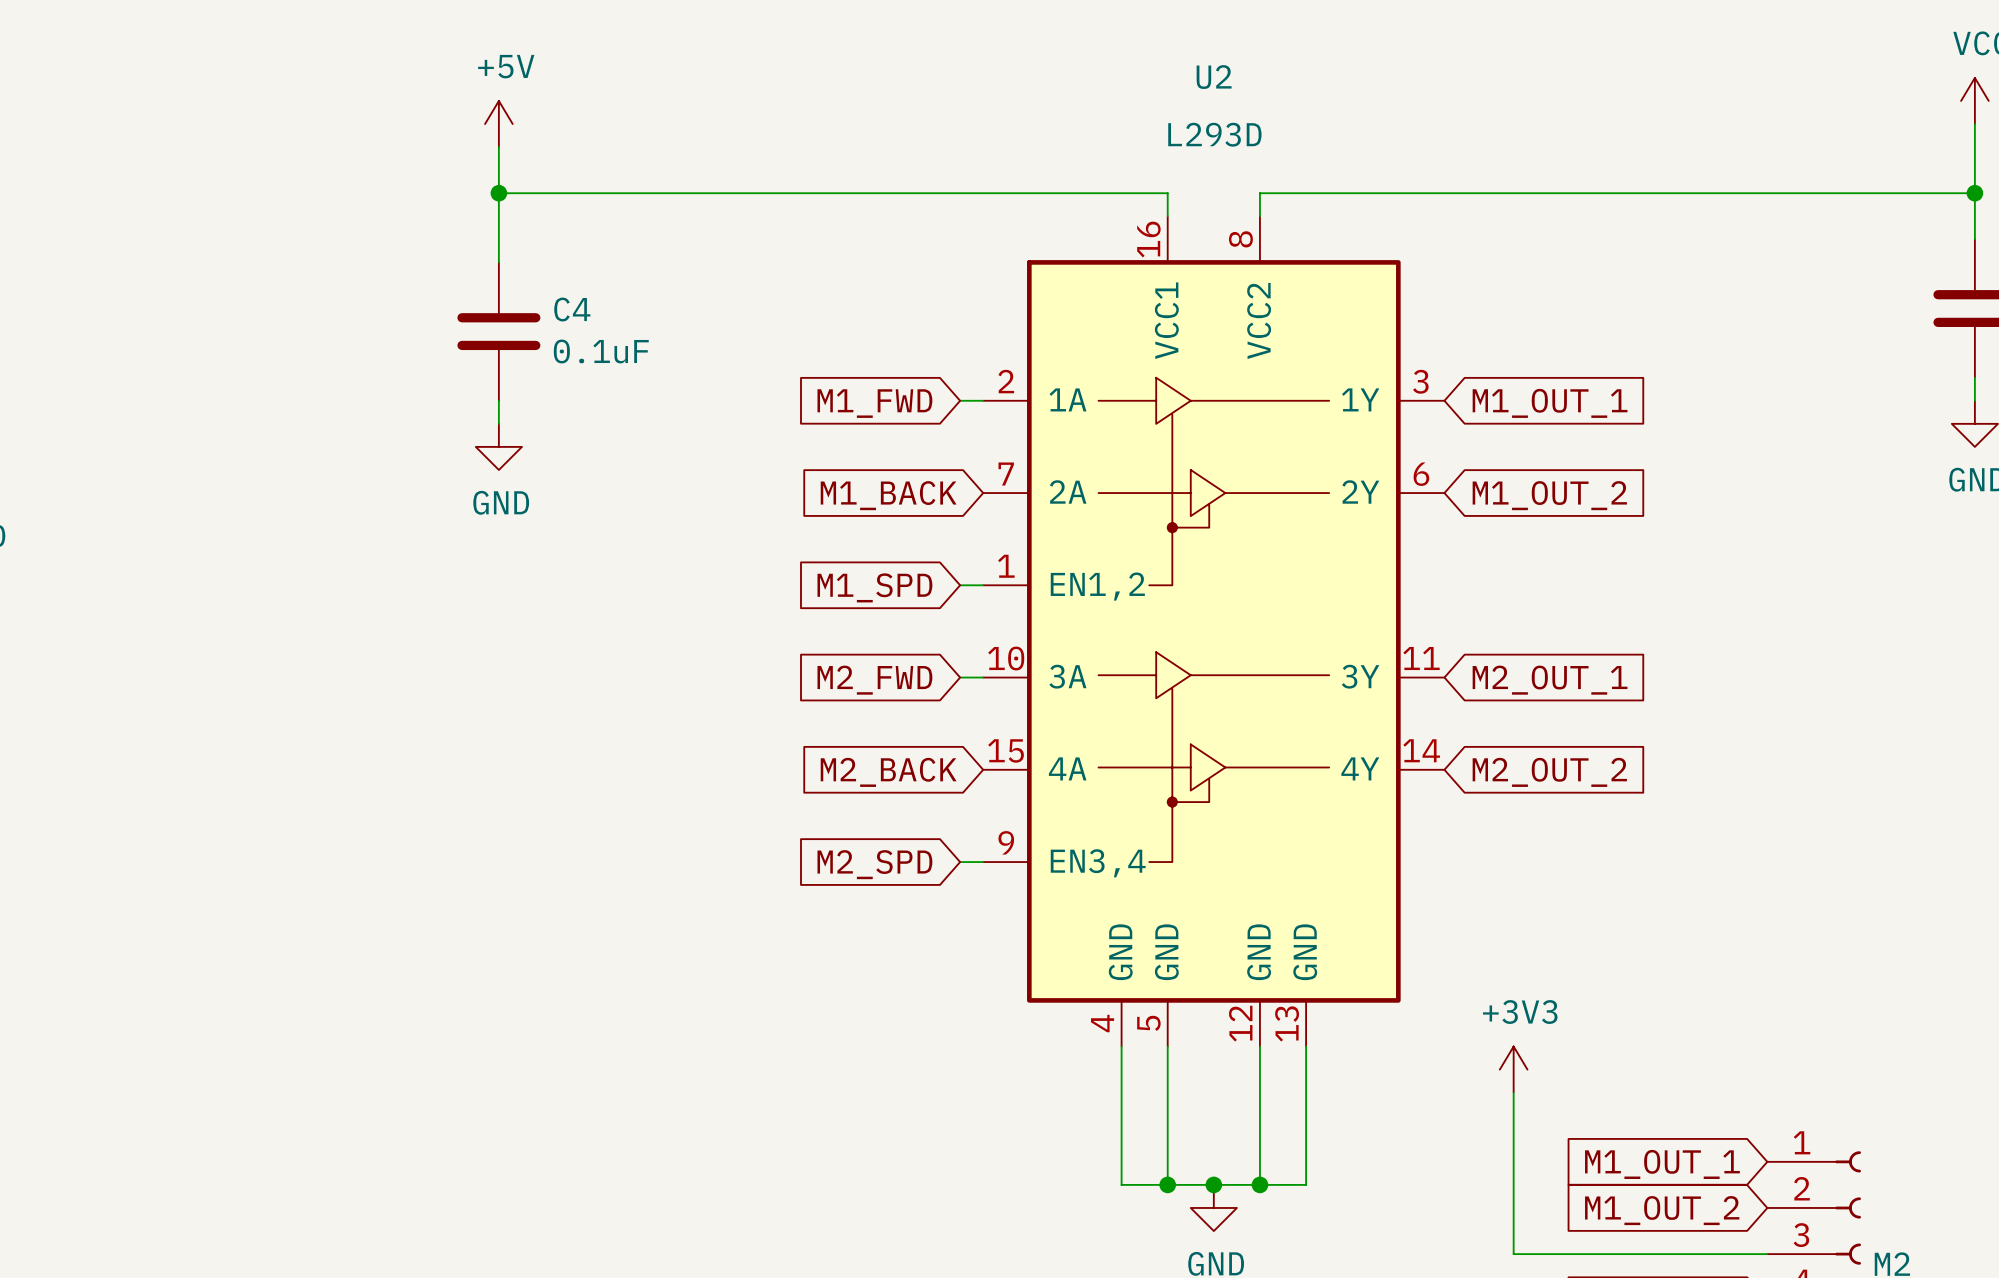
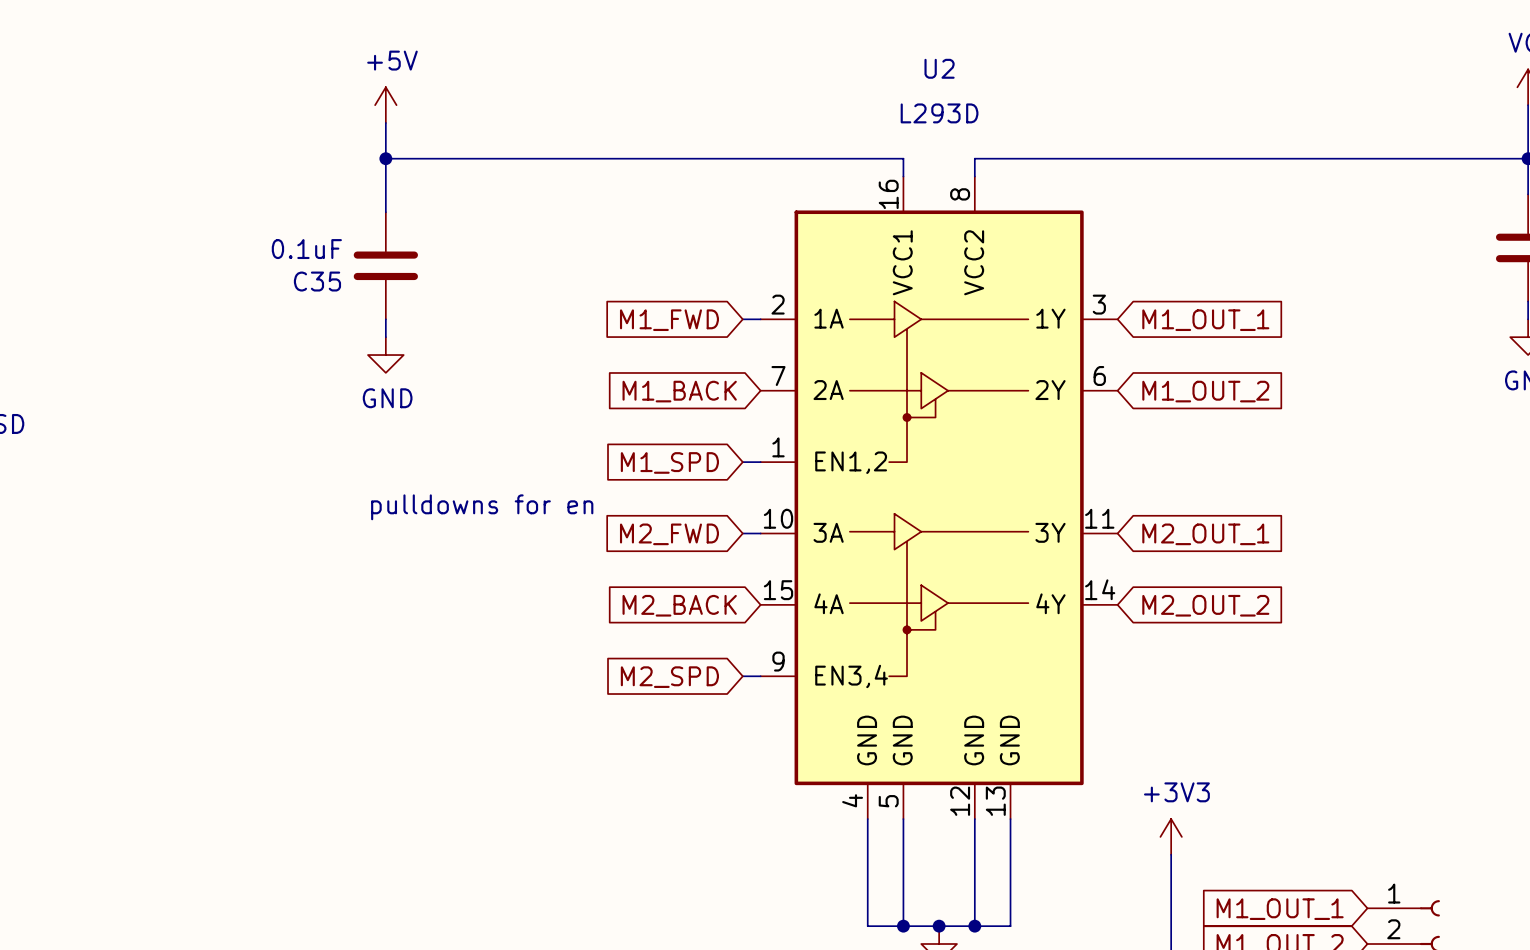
C4 name: C4 (572, 309) -> C35 (317, 281)
C4 value position: 0.1uF (601, 351) -> 0.1uF (306, 249)
text: none -> pulldowns for en (482, 507)

